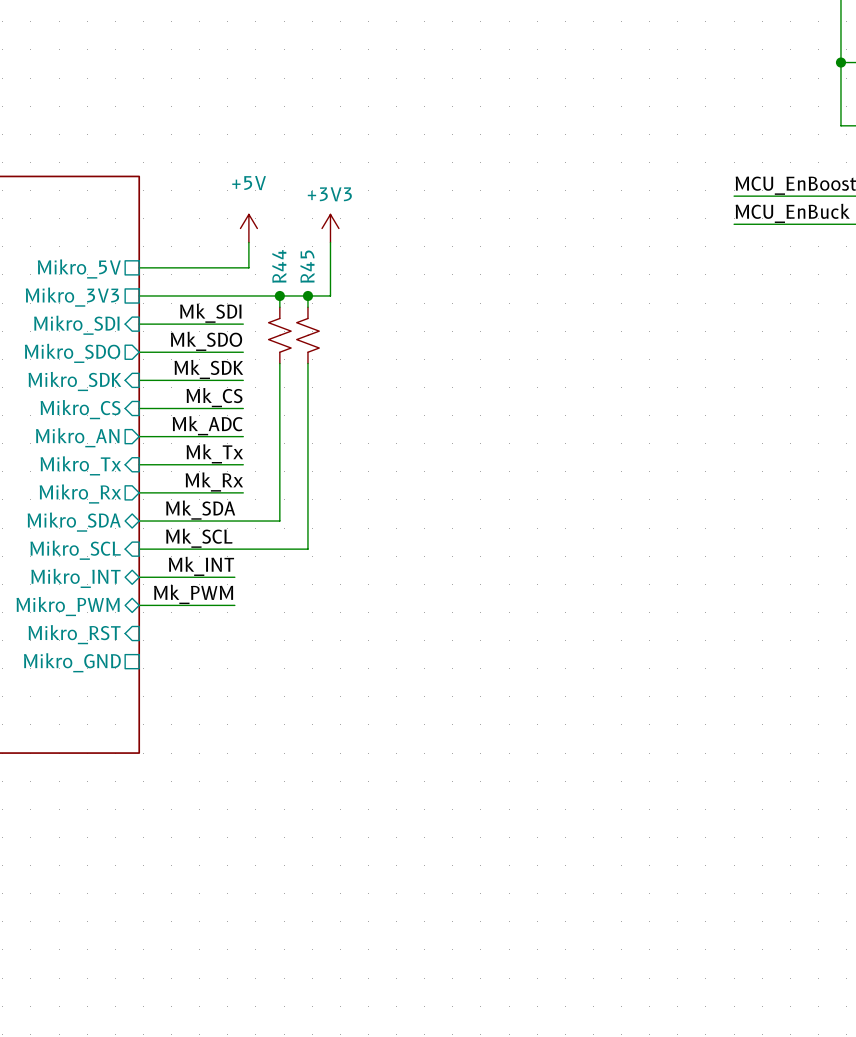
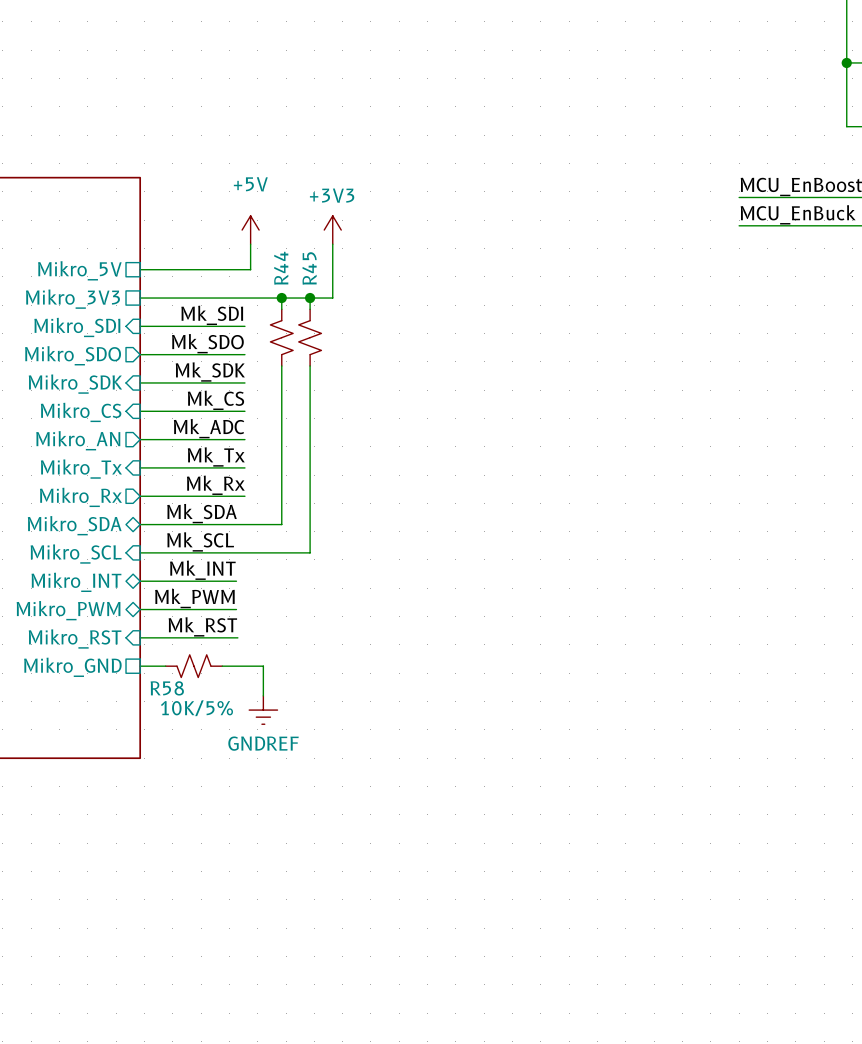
label: none -> Mk_RST (202, 626)
wire: none -> (140, 637) (237, 637)
wire: none -> (140, 666) (165, 666)
R58: none -> 10K/5% (193, 666)
wire: none -> (222, 666) (263, 666) (263, 695)
power symbol: none -> GNDREF (263, 710)

